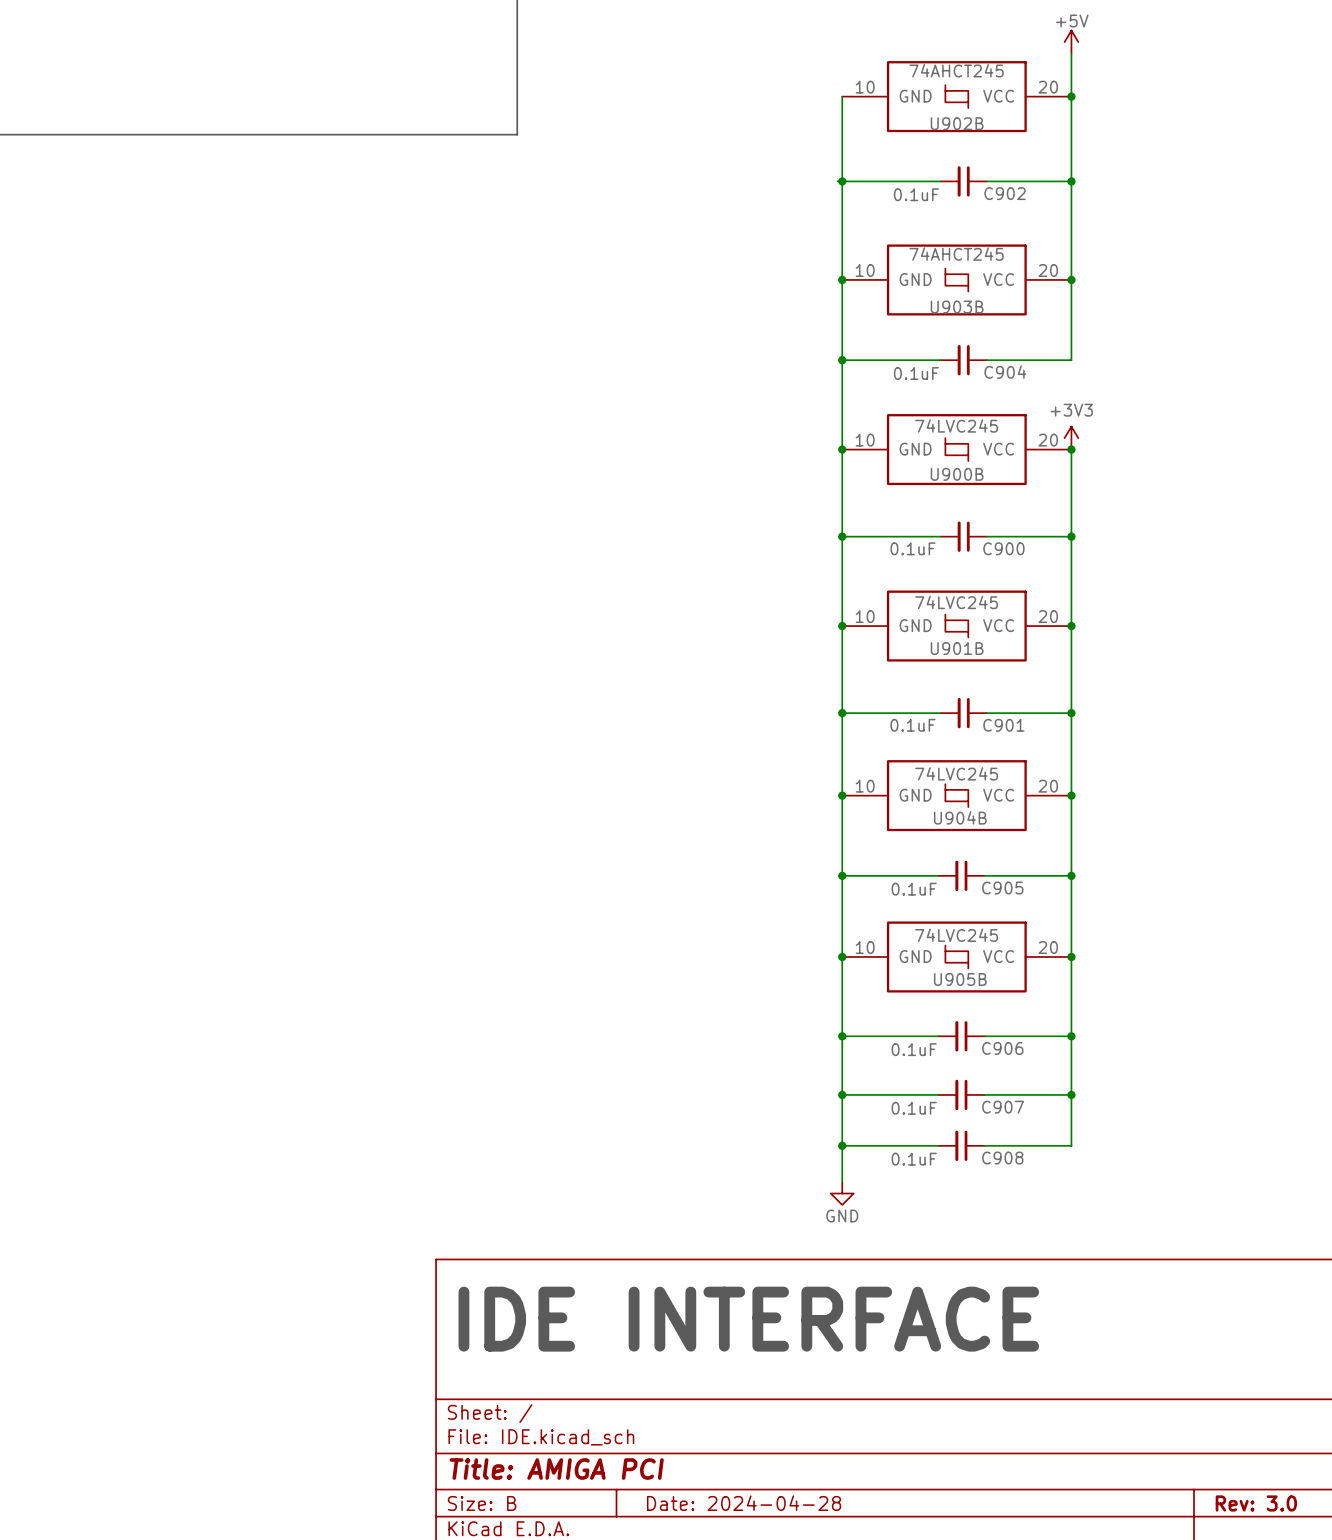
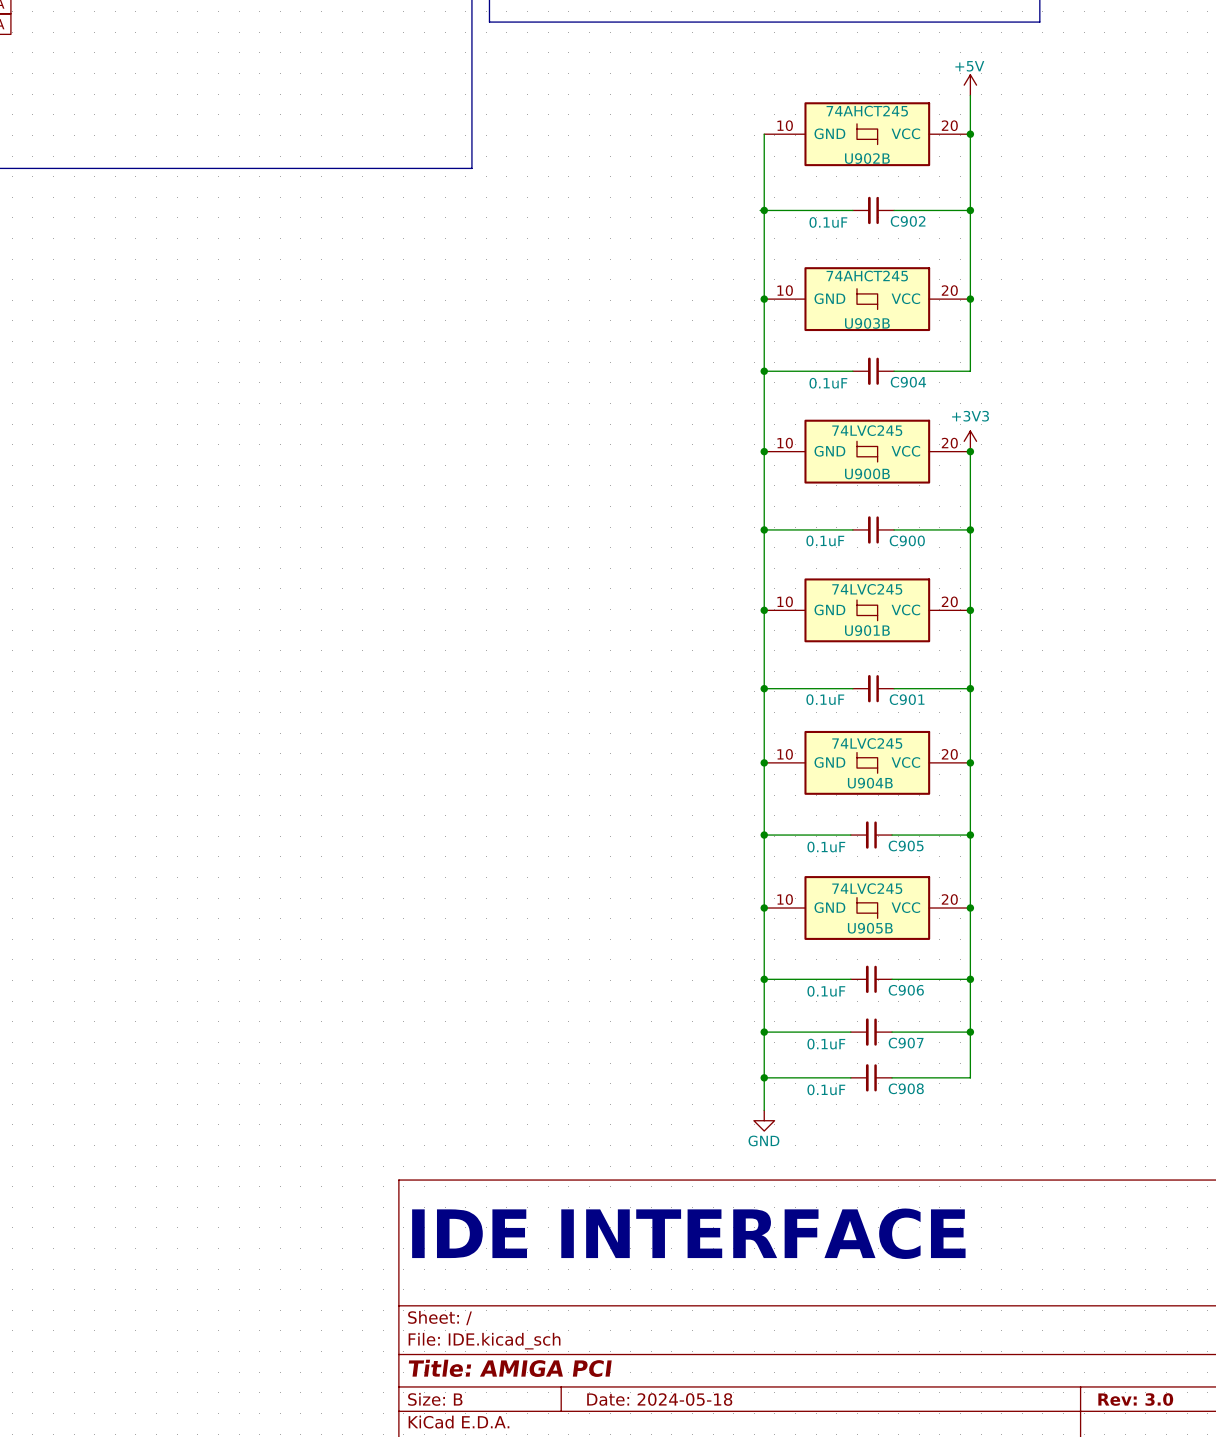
title block: Date: 2024-04-28 (744, 1503) -> Date: 2024-05-18 (659, 1399)

